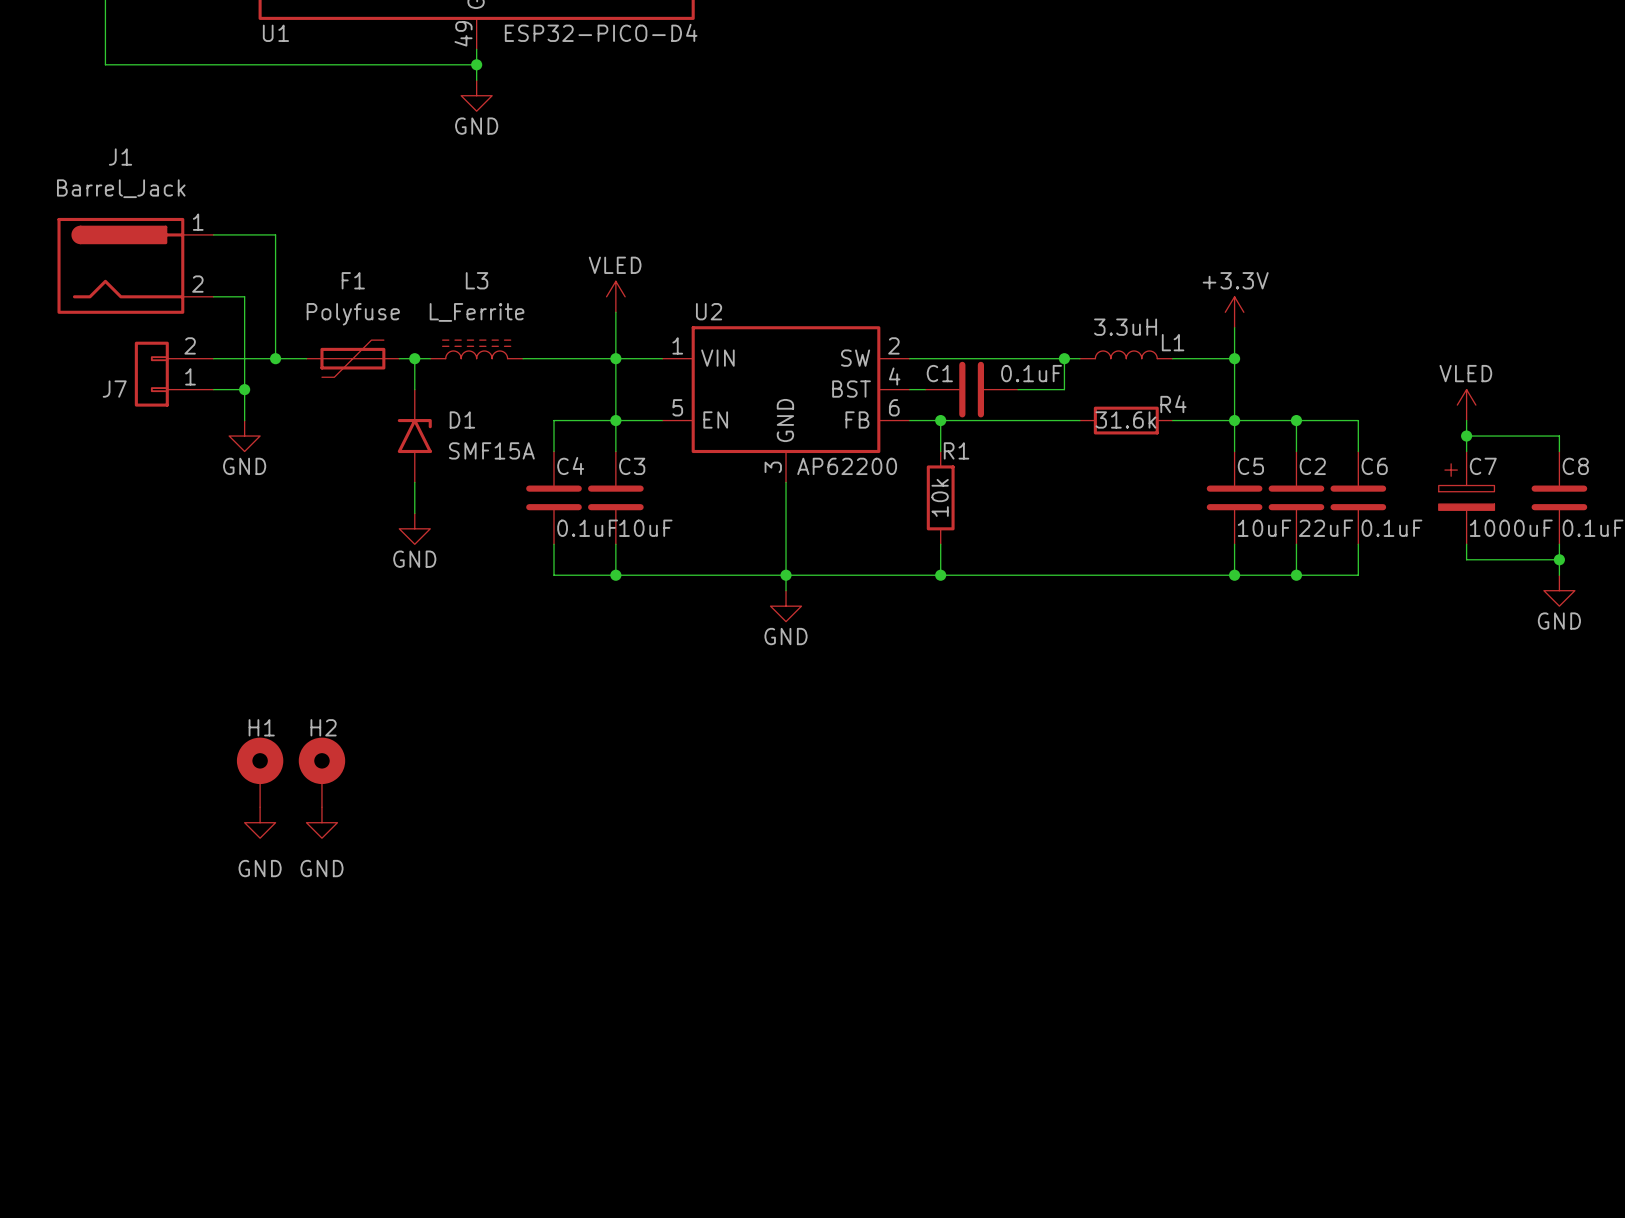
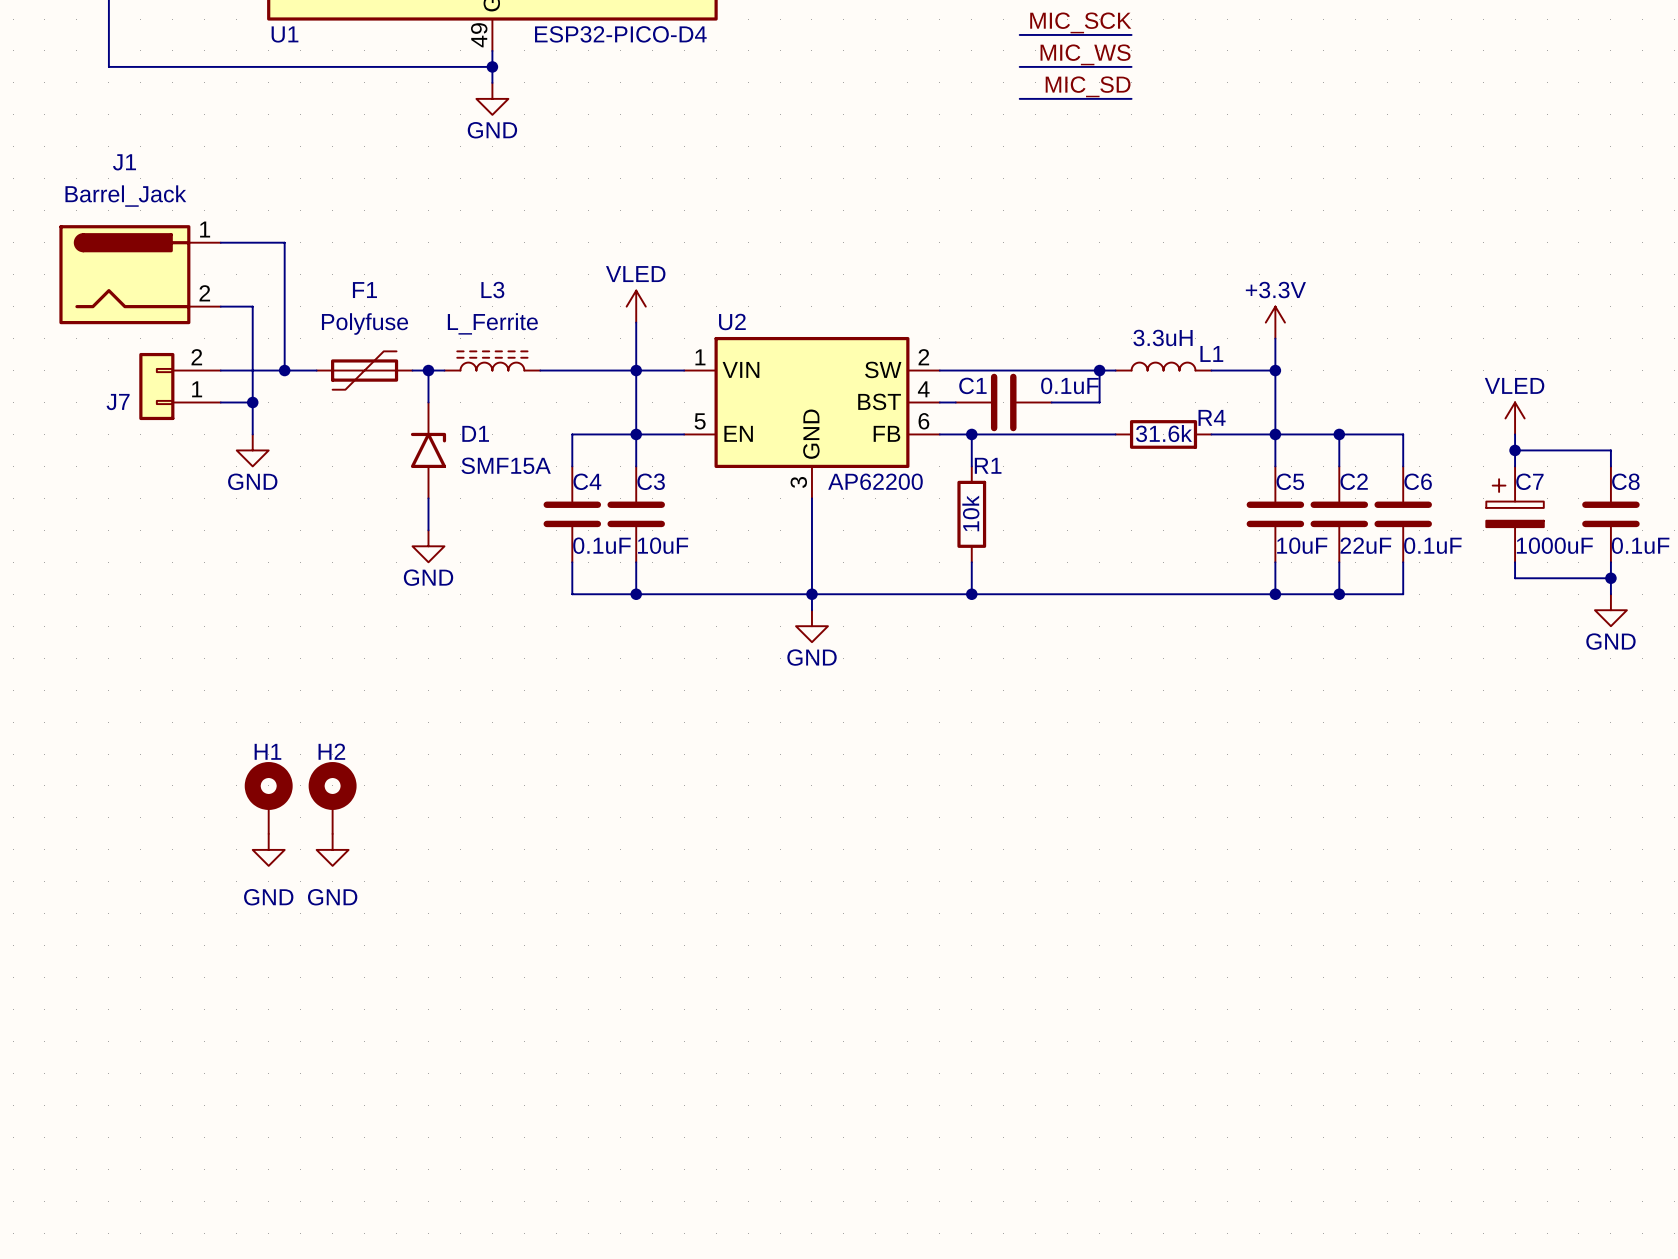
label: none -> MIC_SCK (1080, 22)
wire: none -> (1019, 34) (1131, 34)
label: none -> MIC_WS (1085, 54)
wire: none -> (1019, 66) (1131, 66)
label: none -> MIC_SD (1088, 86)
wire: none -> (1019, 98) (1131, 98)

